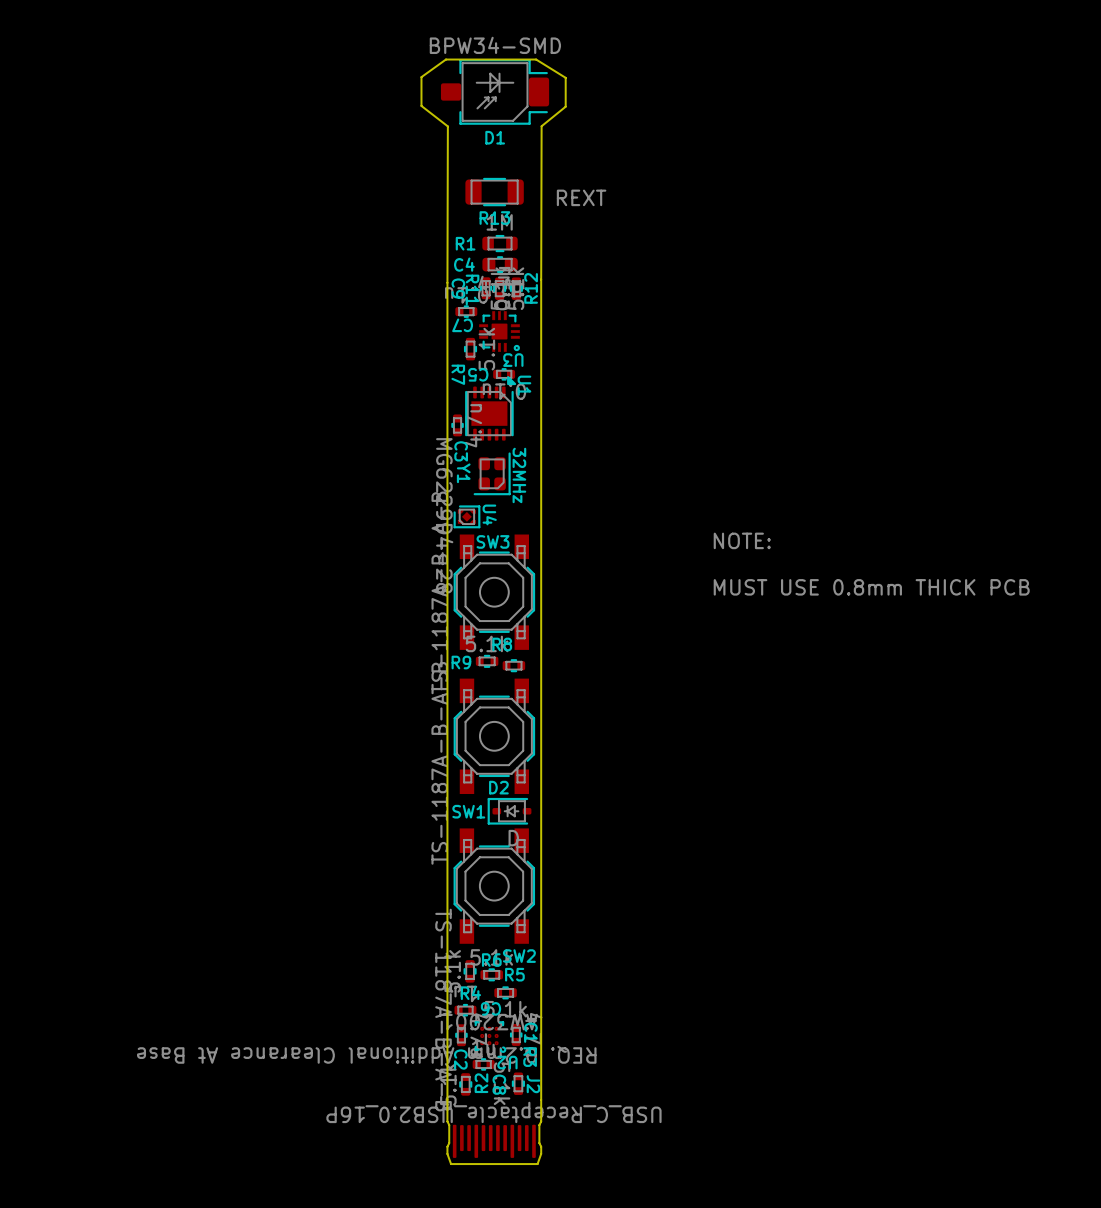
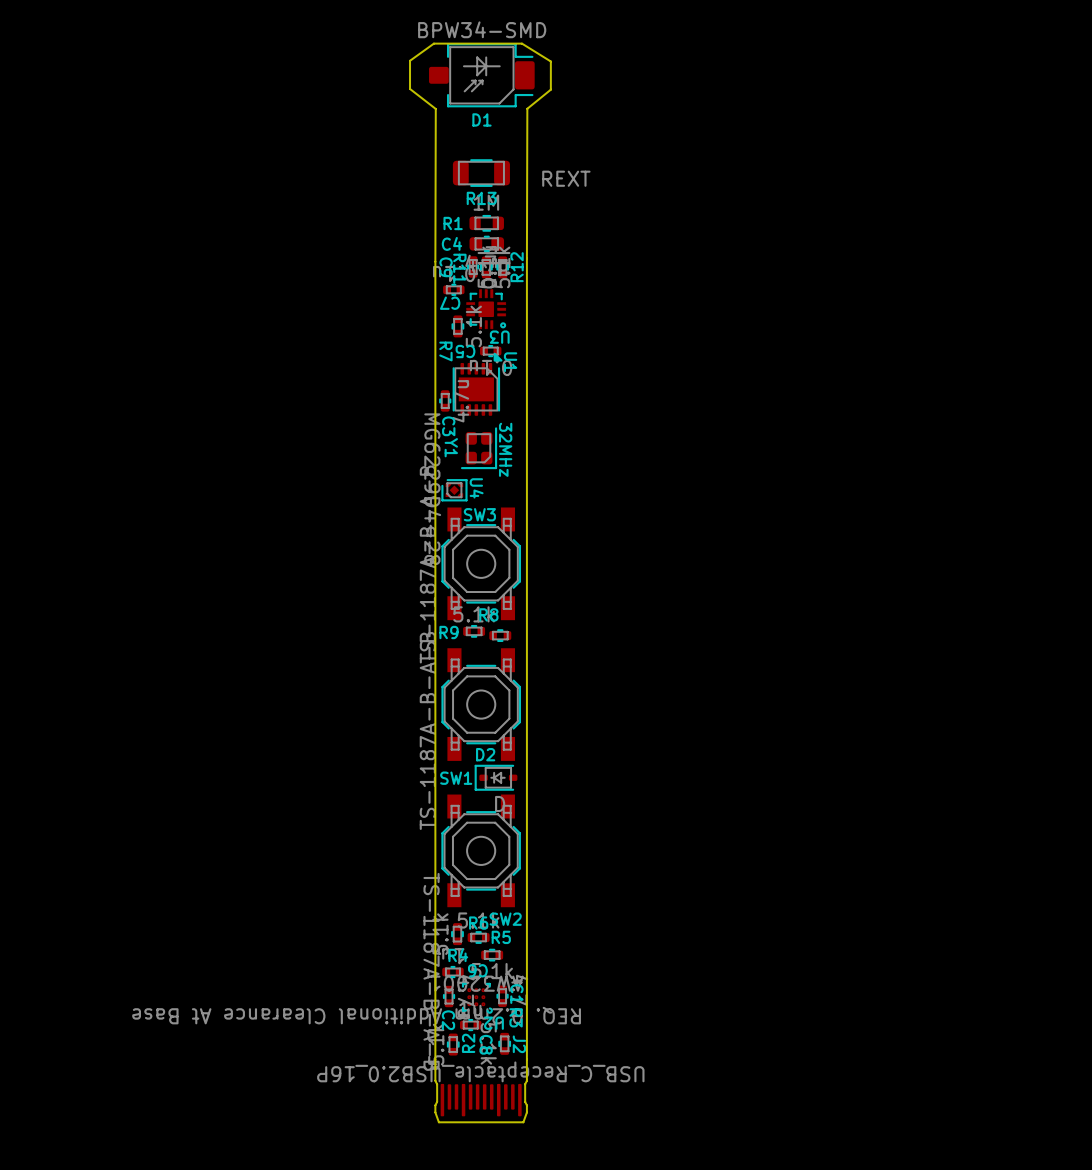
text: NOTE: (742, 540) -> none
text: MUST USE 0.8mm THICK PCB (871, 587) -> none

